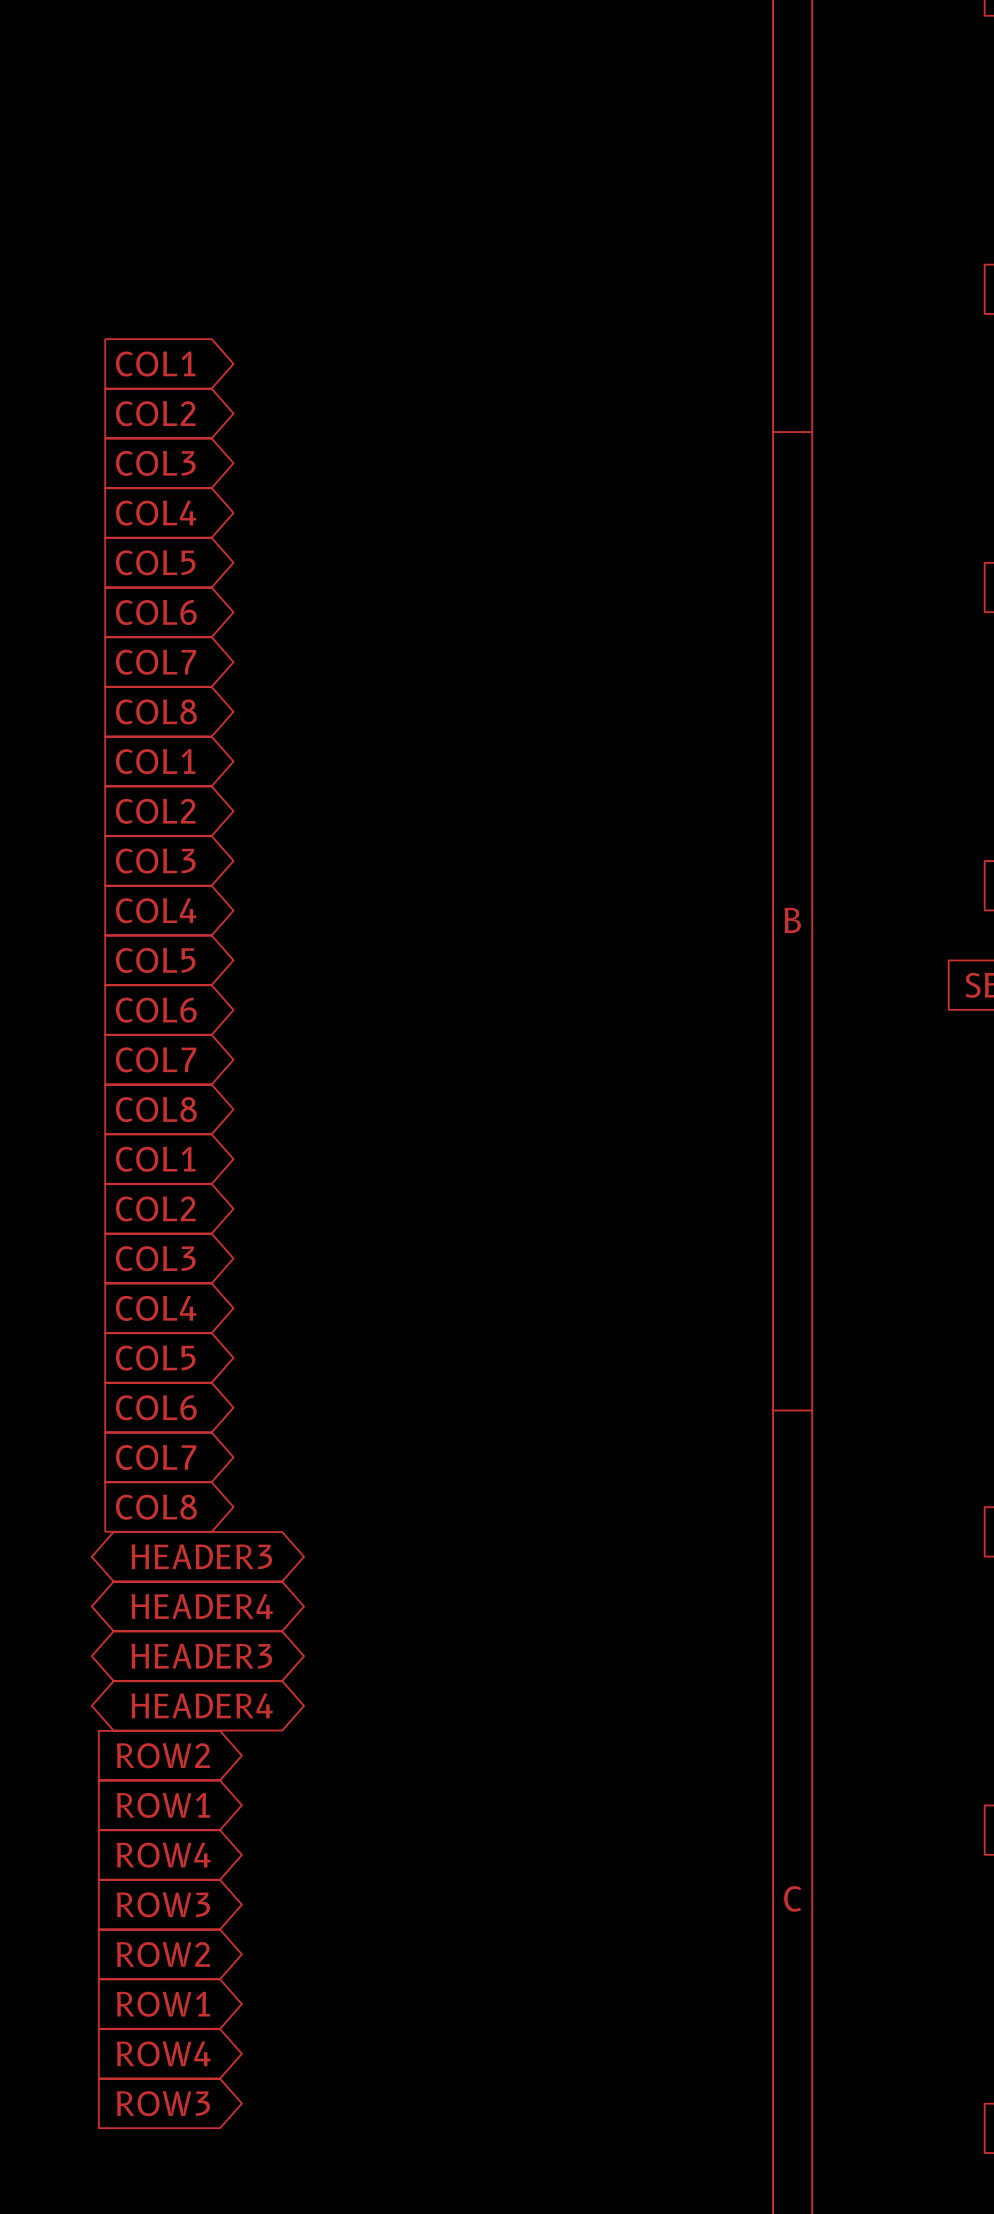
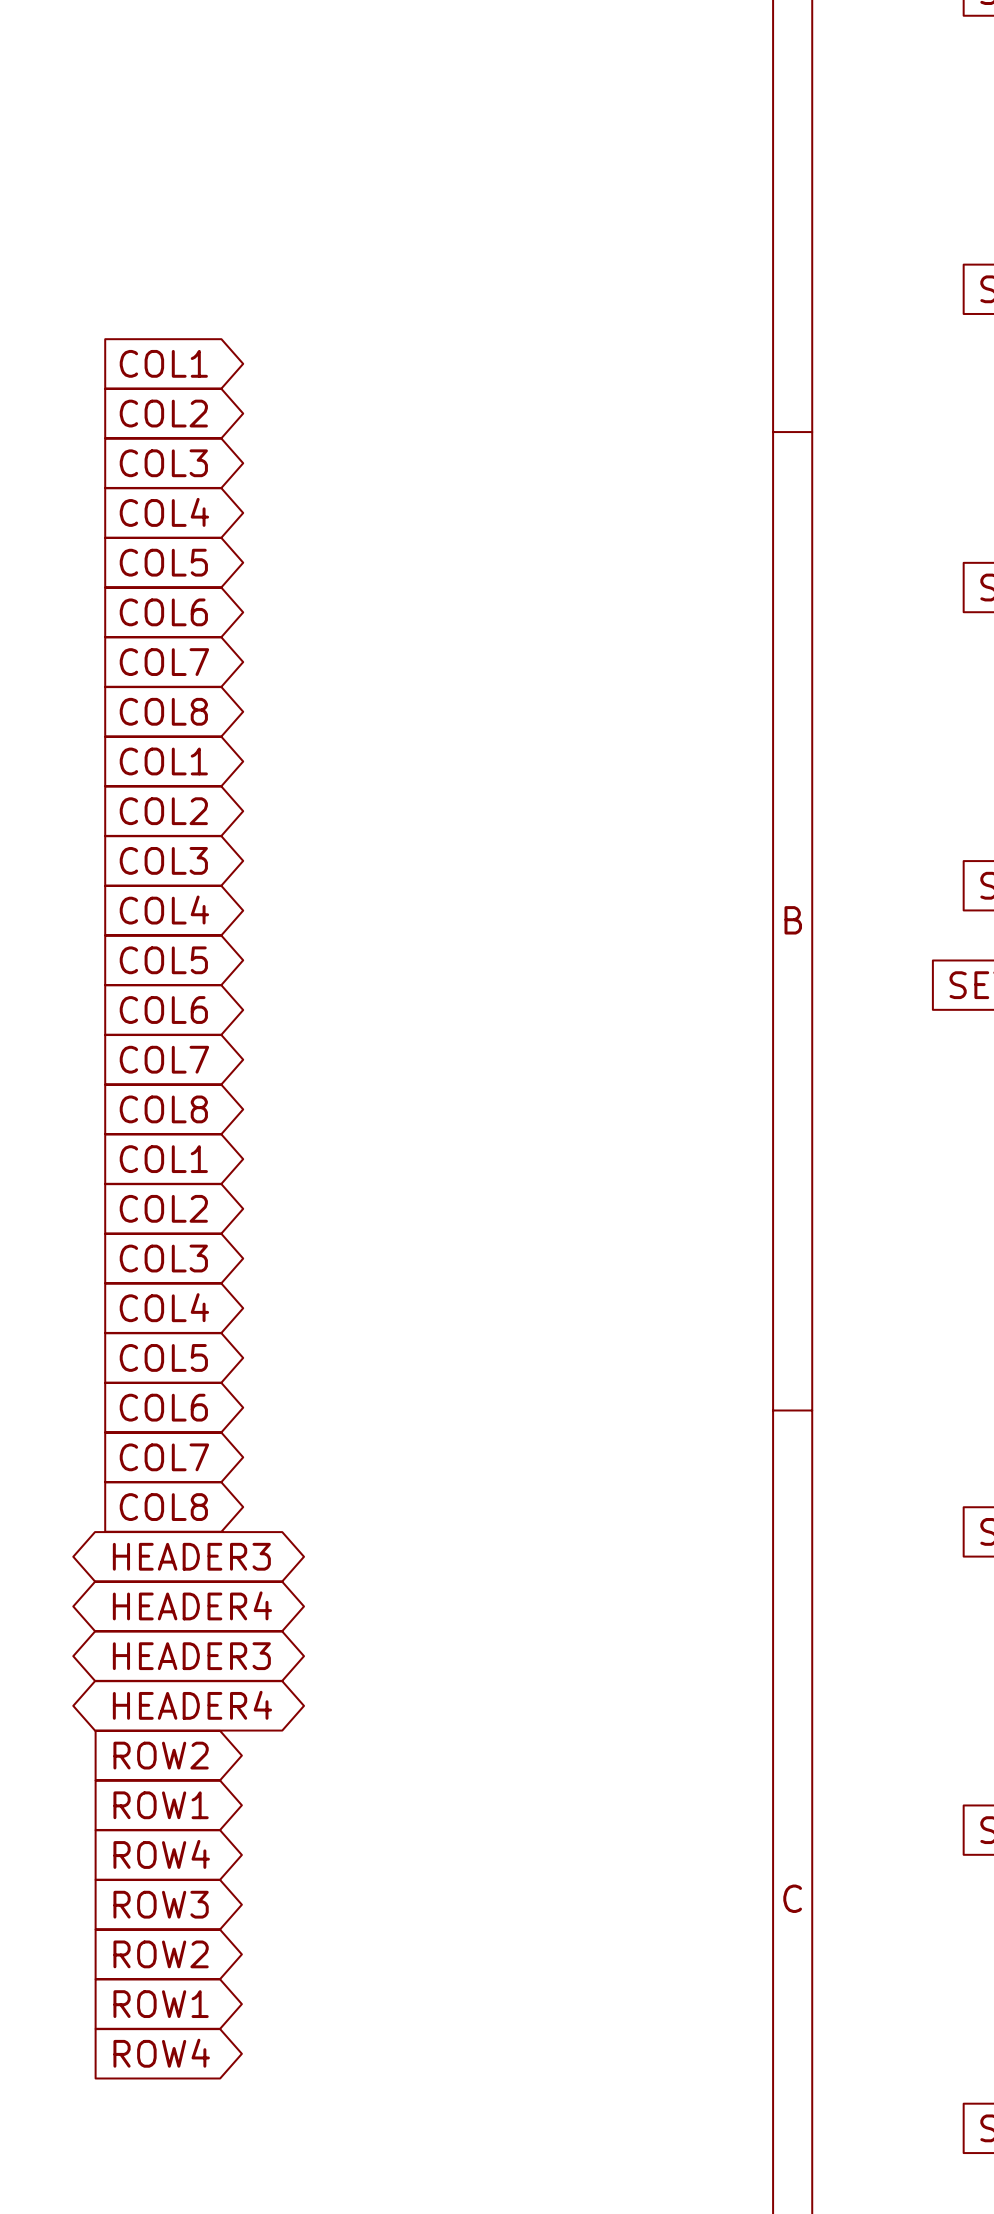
global label: ROW3 (163, 2103) -> none

